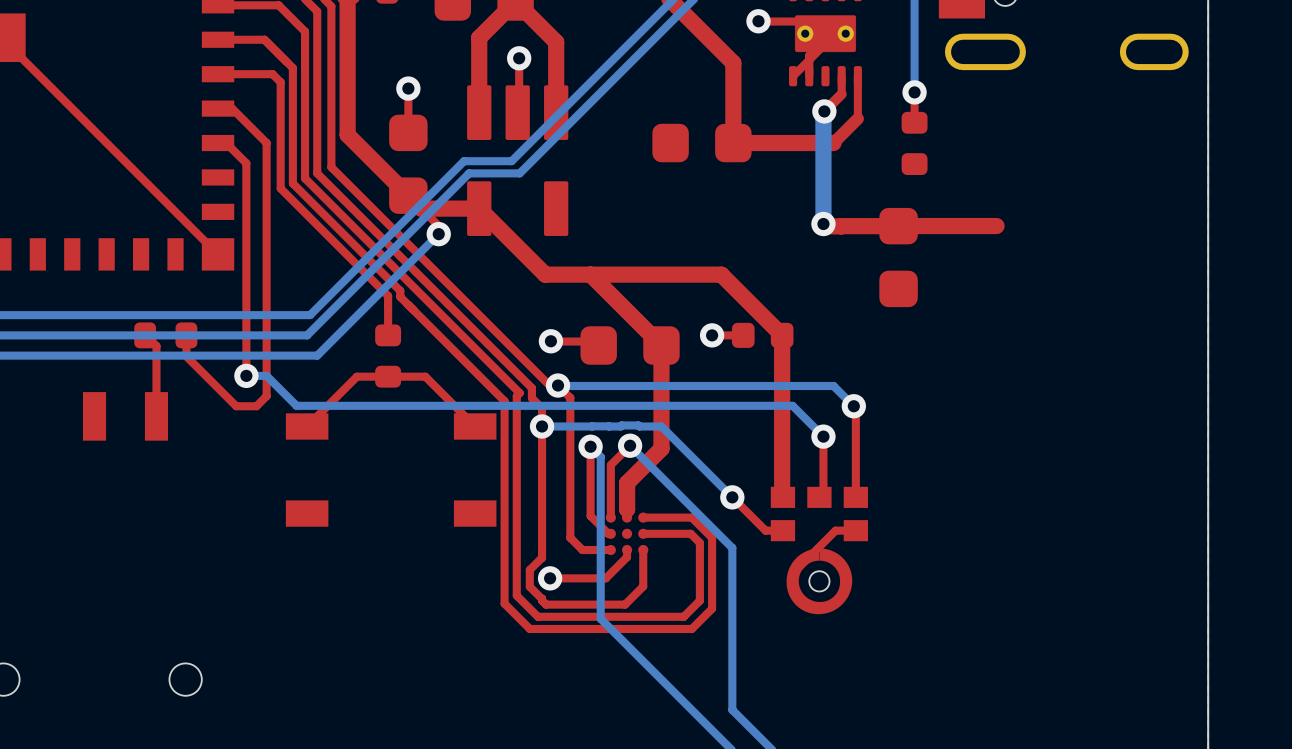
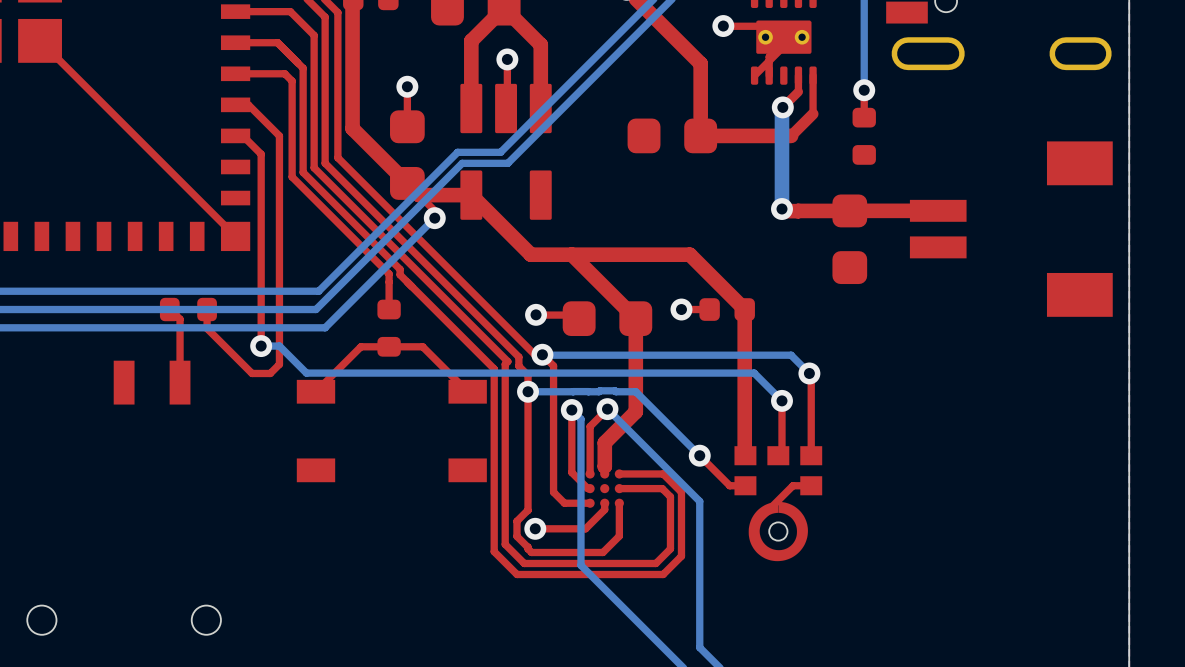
part: none -> (1011, 229)

